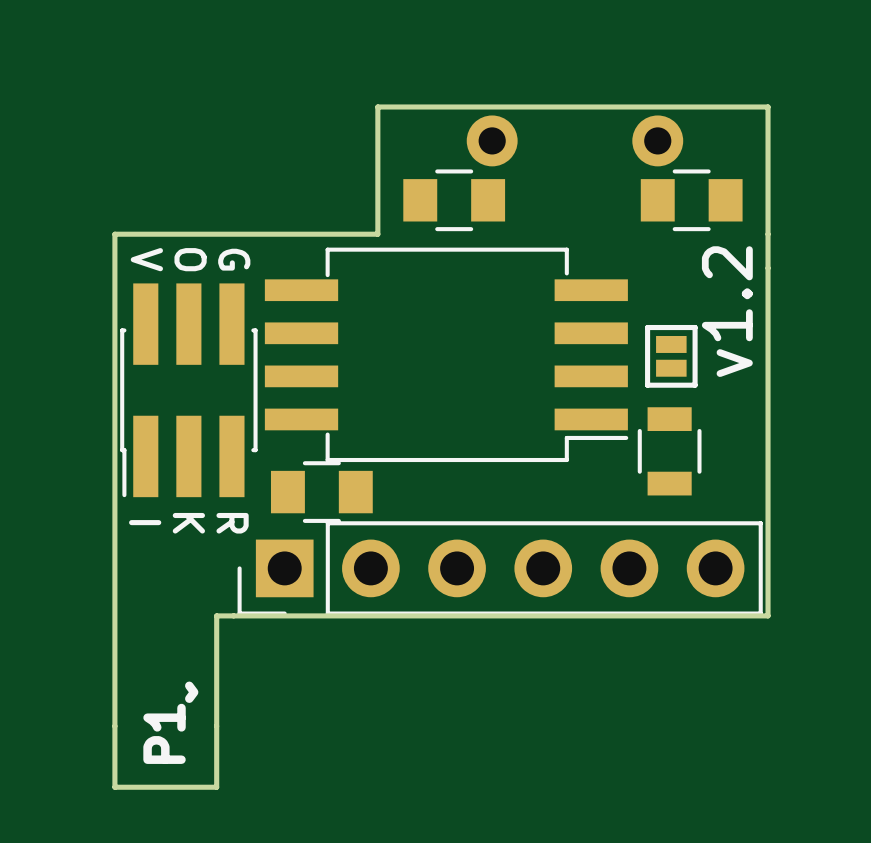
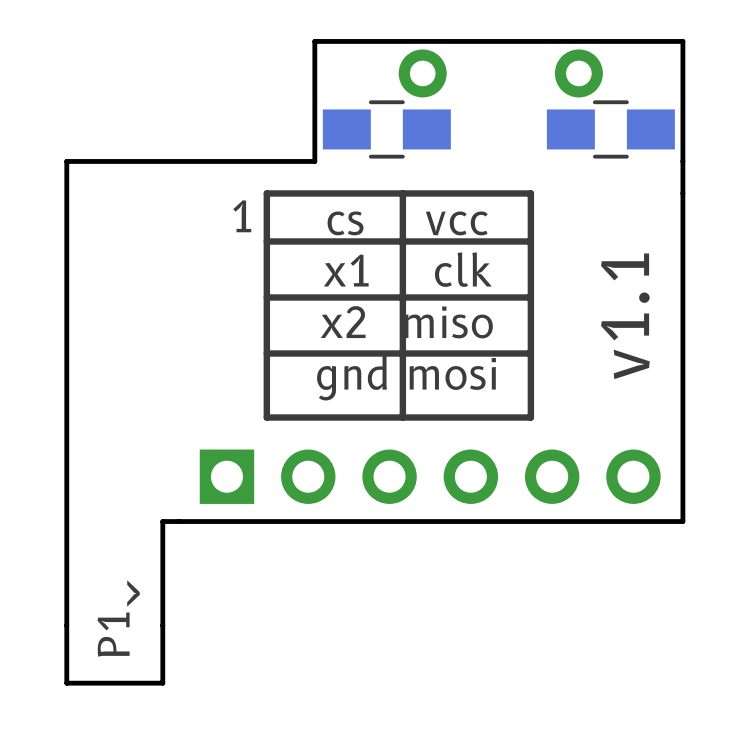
part footprint: [403, 169, 506, 232] -> [322, 100, 451, 159]
part footprint: [640, 169, 743, 232] -> [546, 100, 675, 159]
text: V (146, 259) -> none
text: O (190, 259) -> none
text: G (234, 259) -> none
line: none -> (402, 193) (402, 417)
line: none -> (530, 193) (530, 417) (266, 417) (266, 193) (530, 193)
text: none -> 1 (242, 216)
text: none -> cs vcc (407, 223)
text: v1.2 (727, 311) -> v1.1 (625, 316)
line: none -> (530, 241) (266, 241)
text: none -> x1 clk (407, 269)
part: (446, 354) -> none
part: (671, 356) -> none
line: none -> (530, 297) (266, 297)
part: (188, 390) -> none
text: none -> x2 miso (406, 322)
line: none -> (530, 353) (266, 353)
part: (669, 451) -> none
text: none -> gnd mosi (406, 377)
part: (321, 492) -> none
text: I (145, 522) -> none
text: K (188, 523) -> none
text: R (232, 523) -> none
part side: bottom (500, 568) -> top (430, 476)

